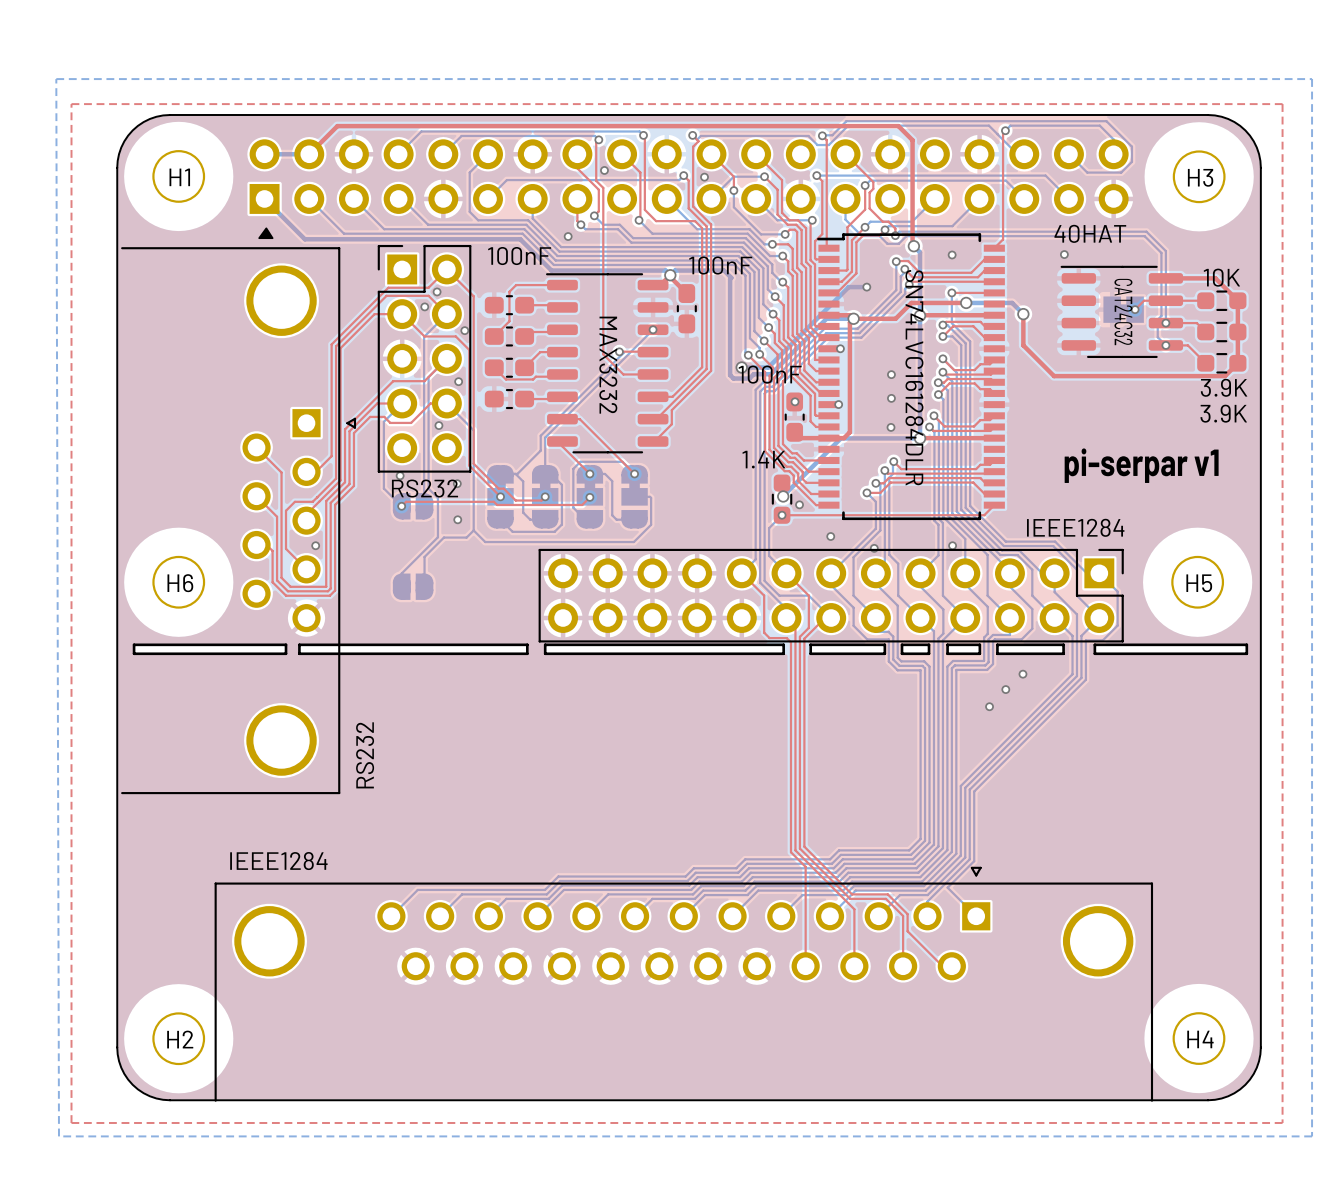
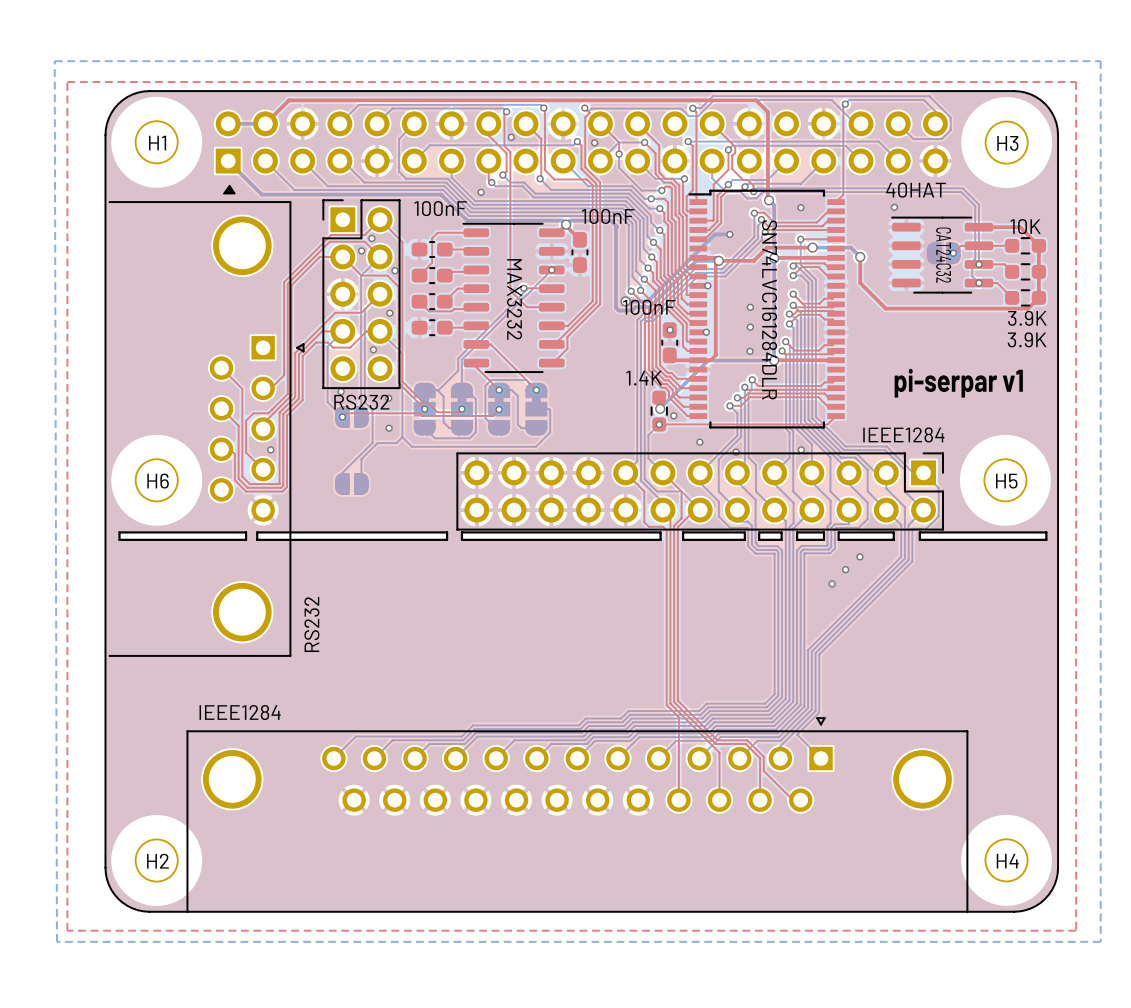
part footprint: [1103, 296, 1144, 323] -> [926, 242, 961, 265]

